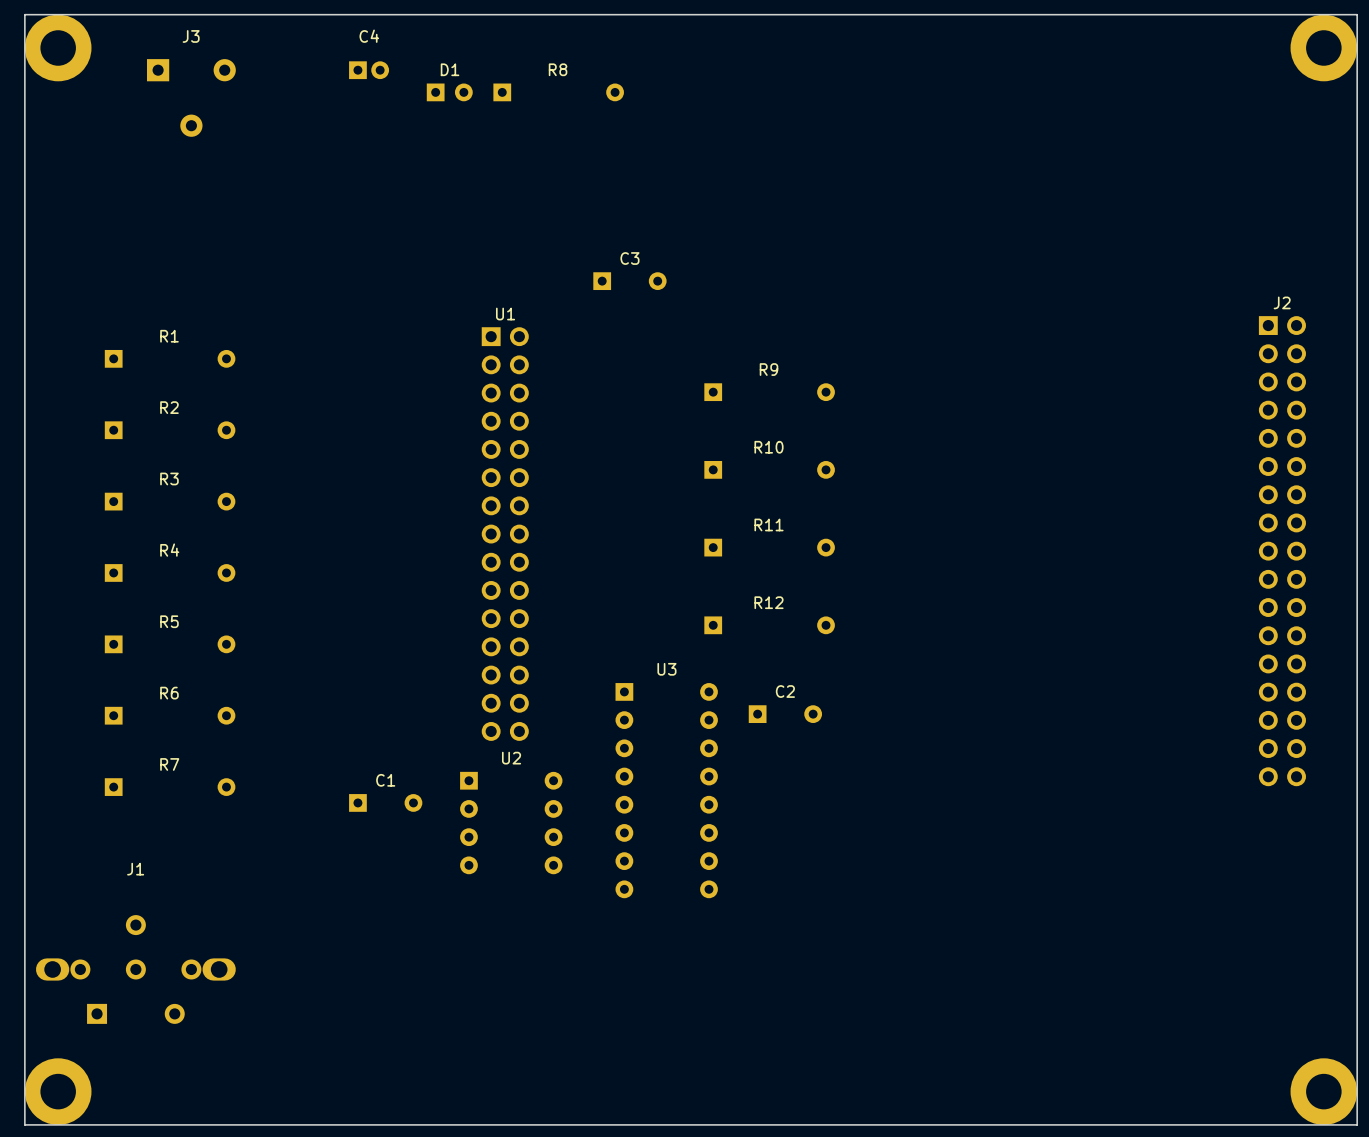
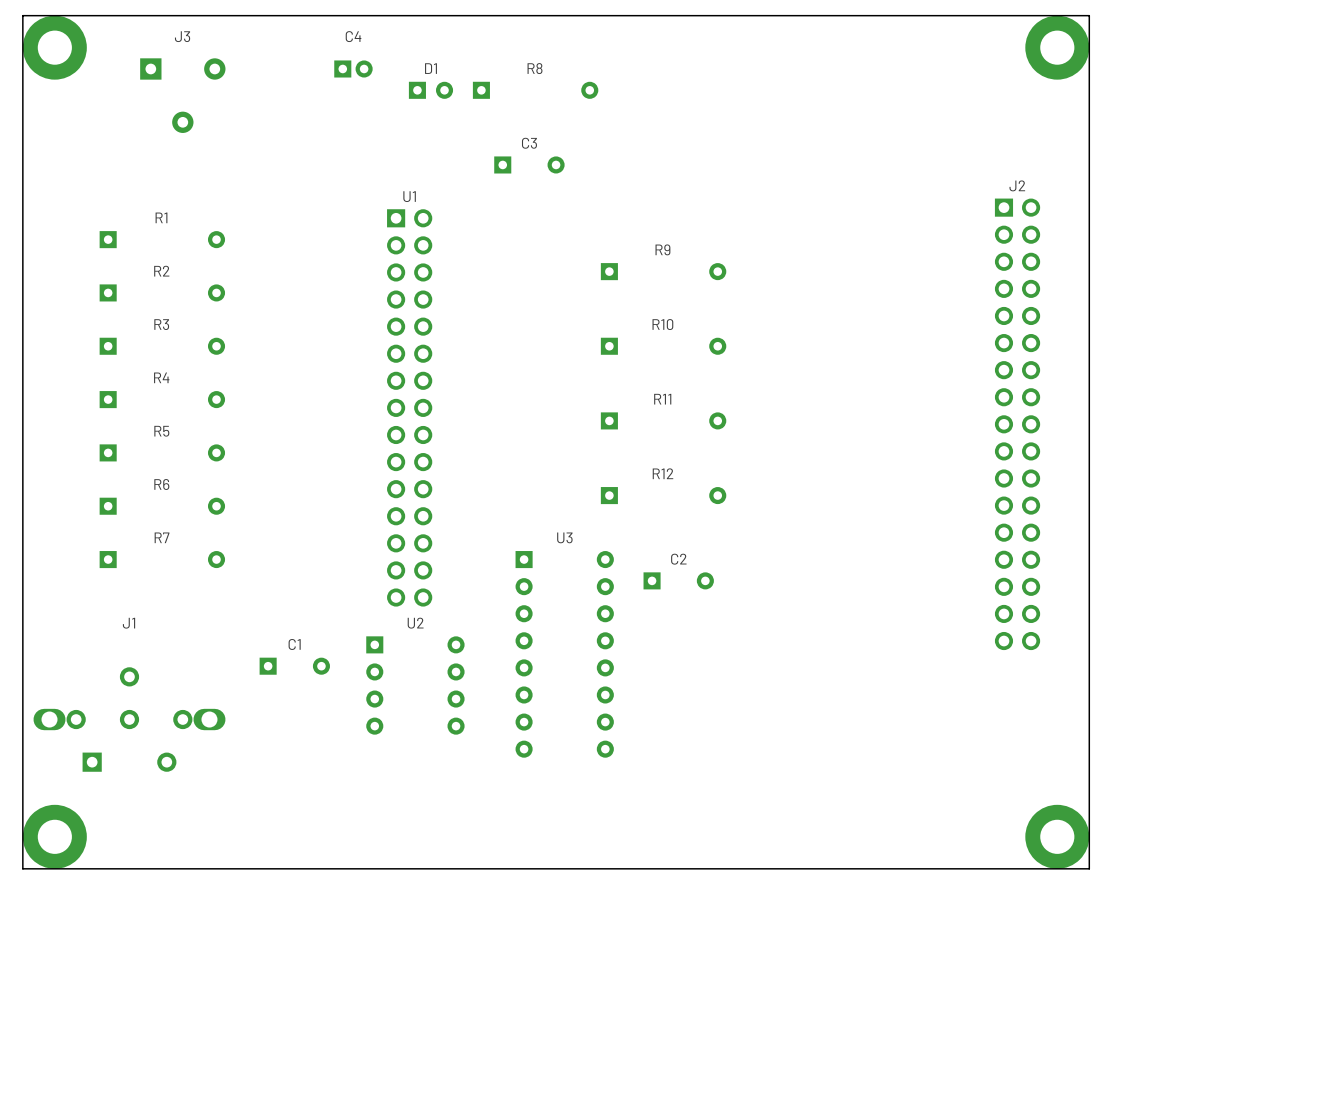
board edge: (1135, 14) (1357, 14) (1357, 1124) (24, 1124) (24, 902) -> (1089, 15) (1089, 868) (22, 868)
part position: (1323, 47) -> (1057, 47)
R1: none -> (162, 239)
C3 position: (629, 281) -> (529, 164)
R1 name: R1 (169, 336) -> R3 (161, 324)
R9 position: (769, 392) -> (663, 271)
R2 position: (170, 430) -> (162, 292)
R10 position: (769, 469) -> (663, 346)
R3: (170, 501) -> none
U1 position: (505, 534) -> (409, 407)
R11 position: (769, 547) -> (663, 420)
J2 position: (1282, 551) -> (1017, 424)
R4 position: (170, 572) -> (162, 399)
R12 position: (769, 625) -> (663, 495)
R5 position: (170, 644) -> (162, 452)
C2 position: (785, 714) -> (678, 580)
R6 position: (170, 715) -> (162, 506)
R7 position: (170, 787) -> (162, 559)
U3 position: (666, 790) -> (564, 654)
C1 position: (385, 802) -> (294, 666)
U2 position: (511, 823) -> (415, 685)
part: none -> (1057, 836)
J1 position: (135, 969) -> (129, 719)
part position: (58, 1091) -> (54, 836)
part: (1323, 1091) -> none

